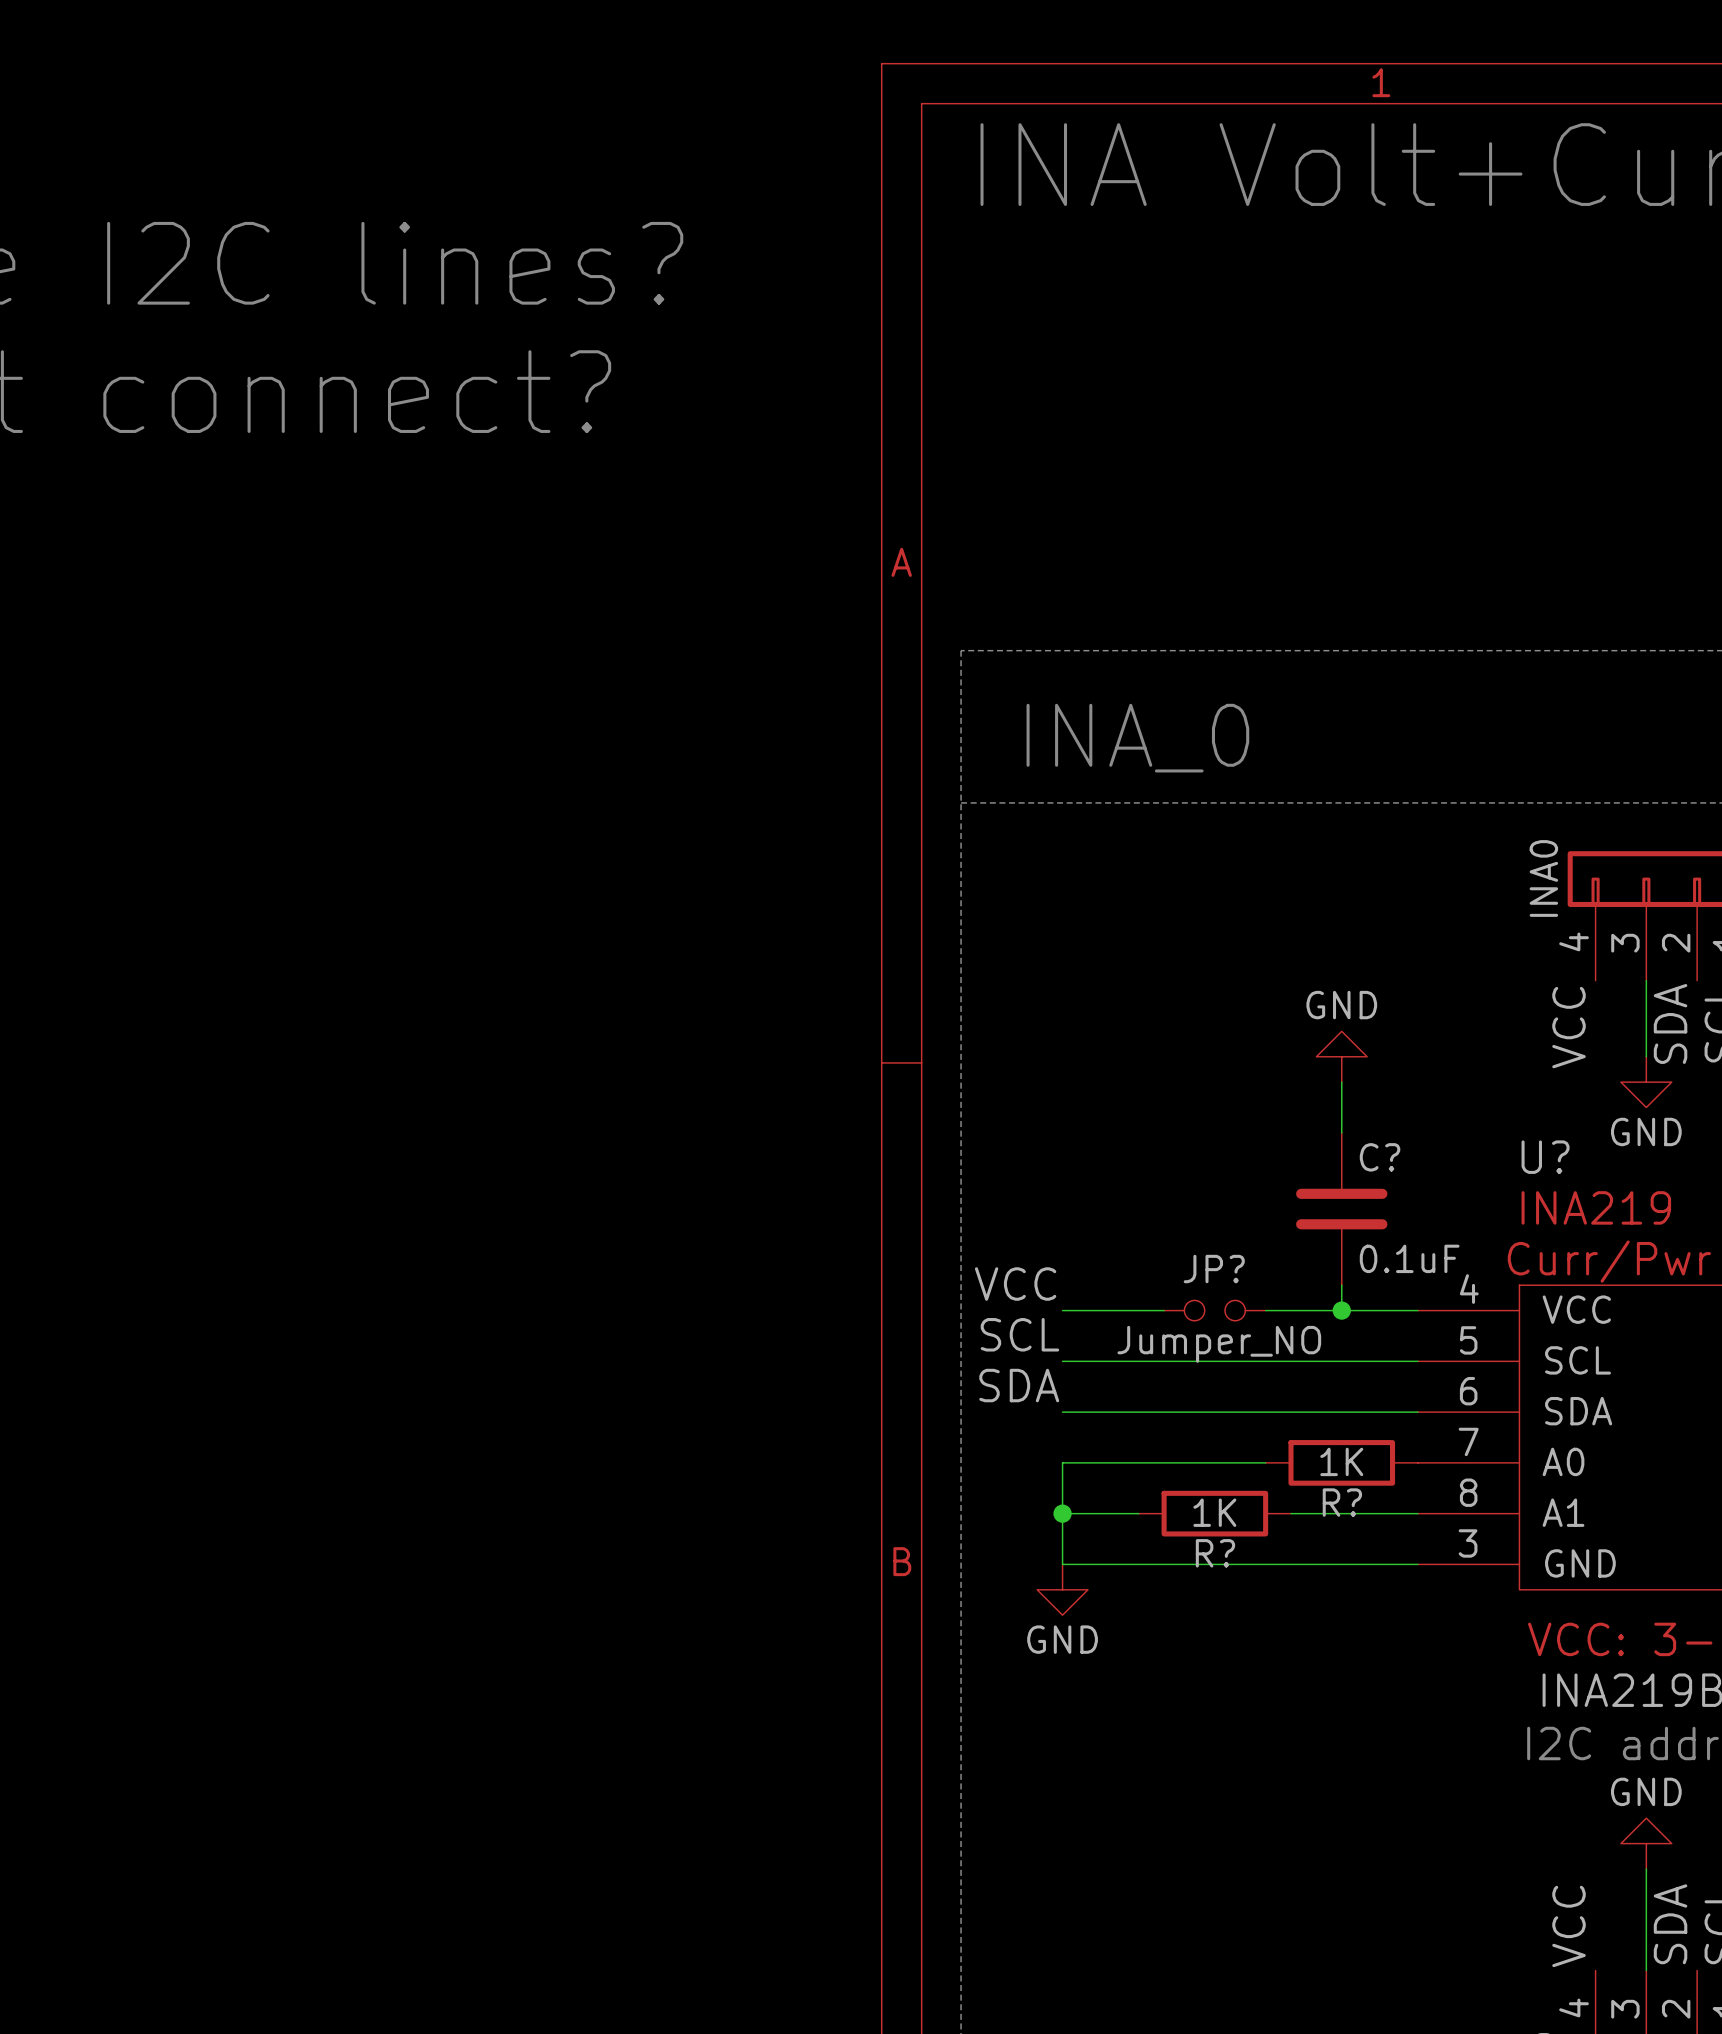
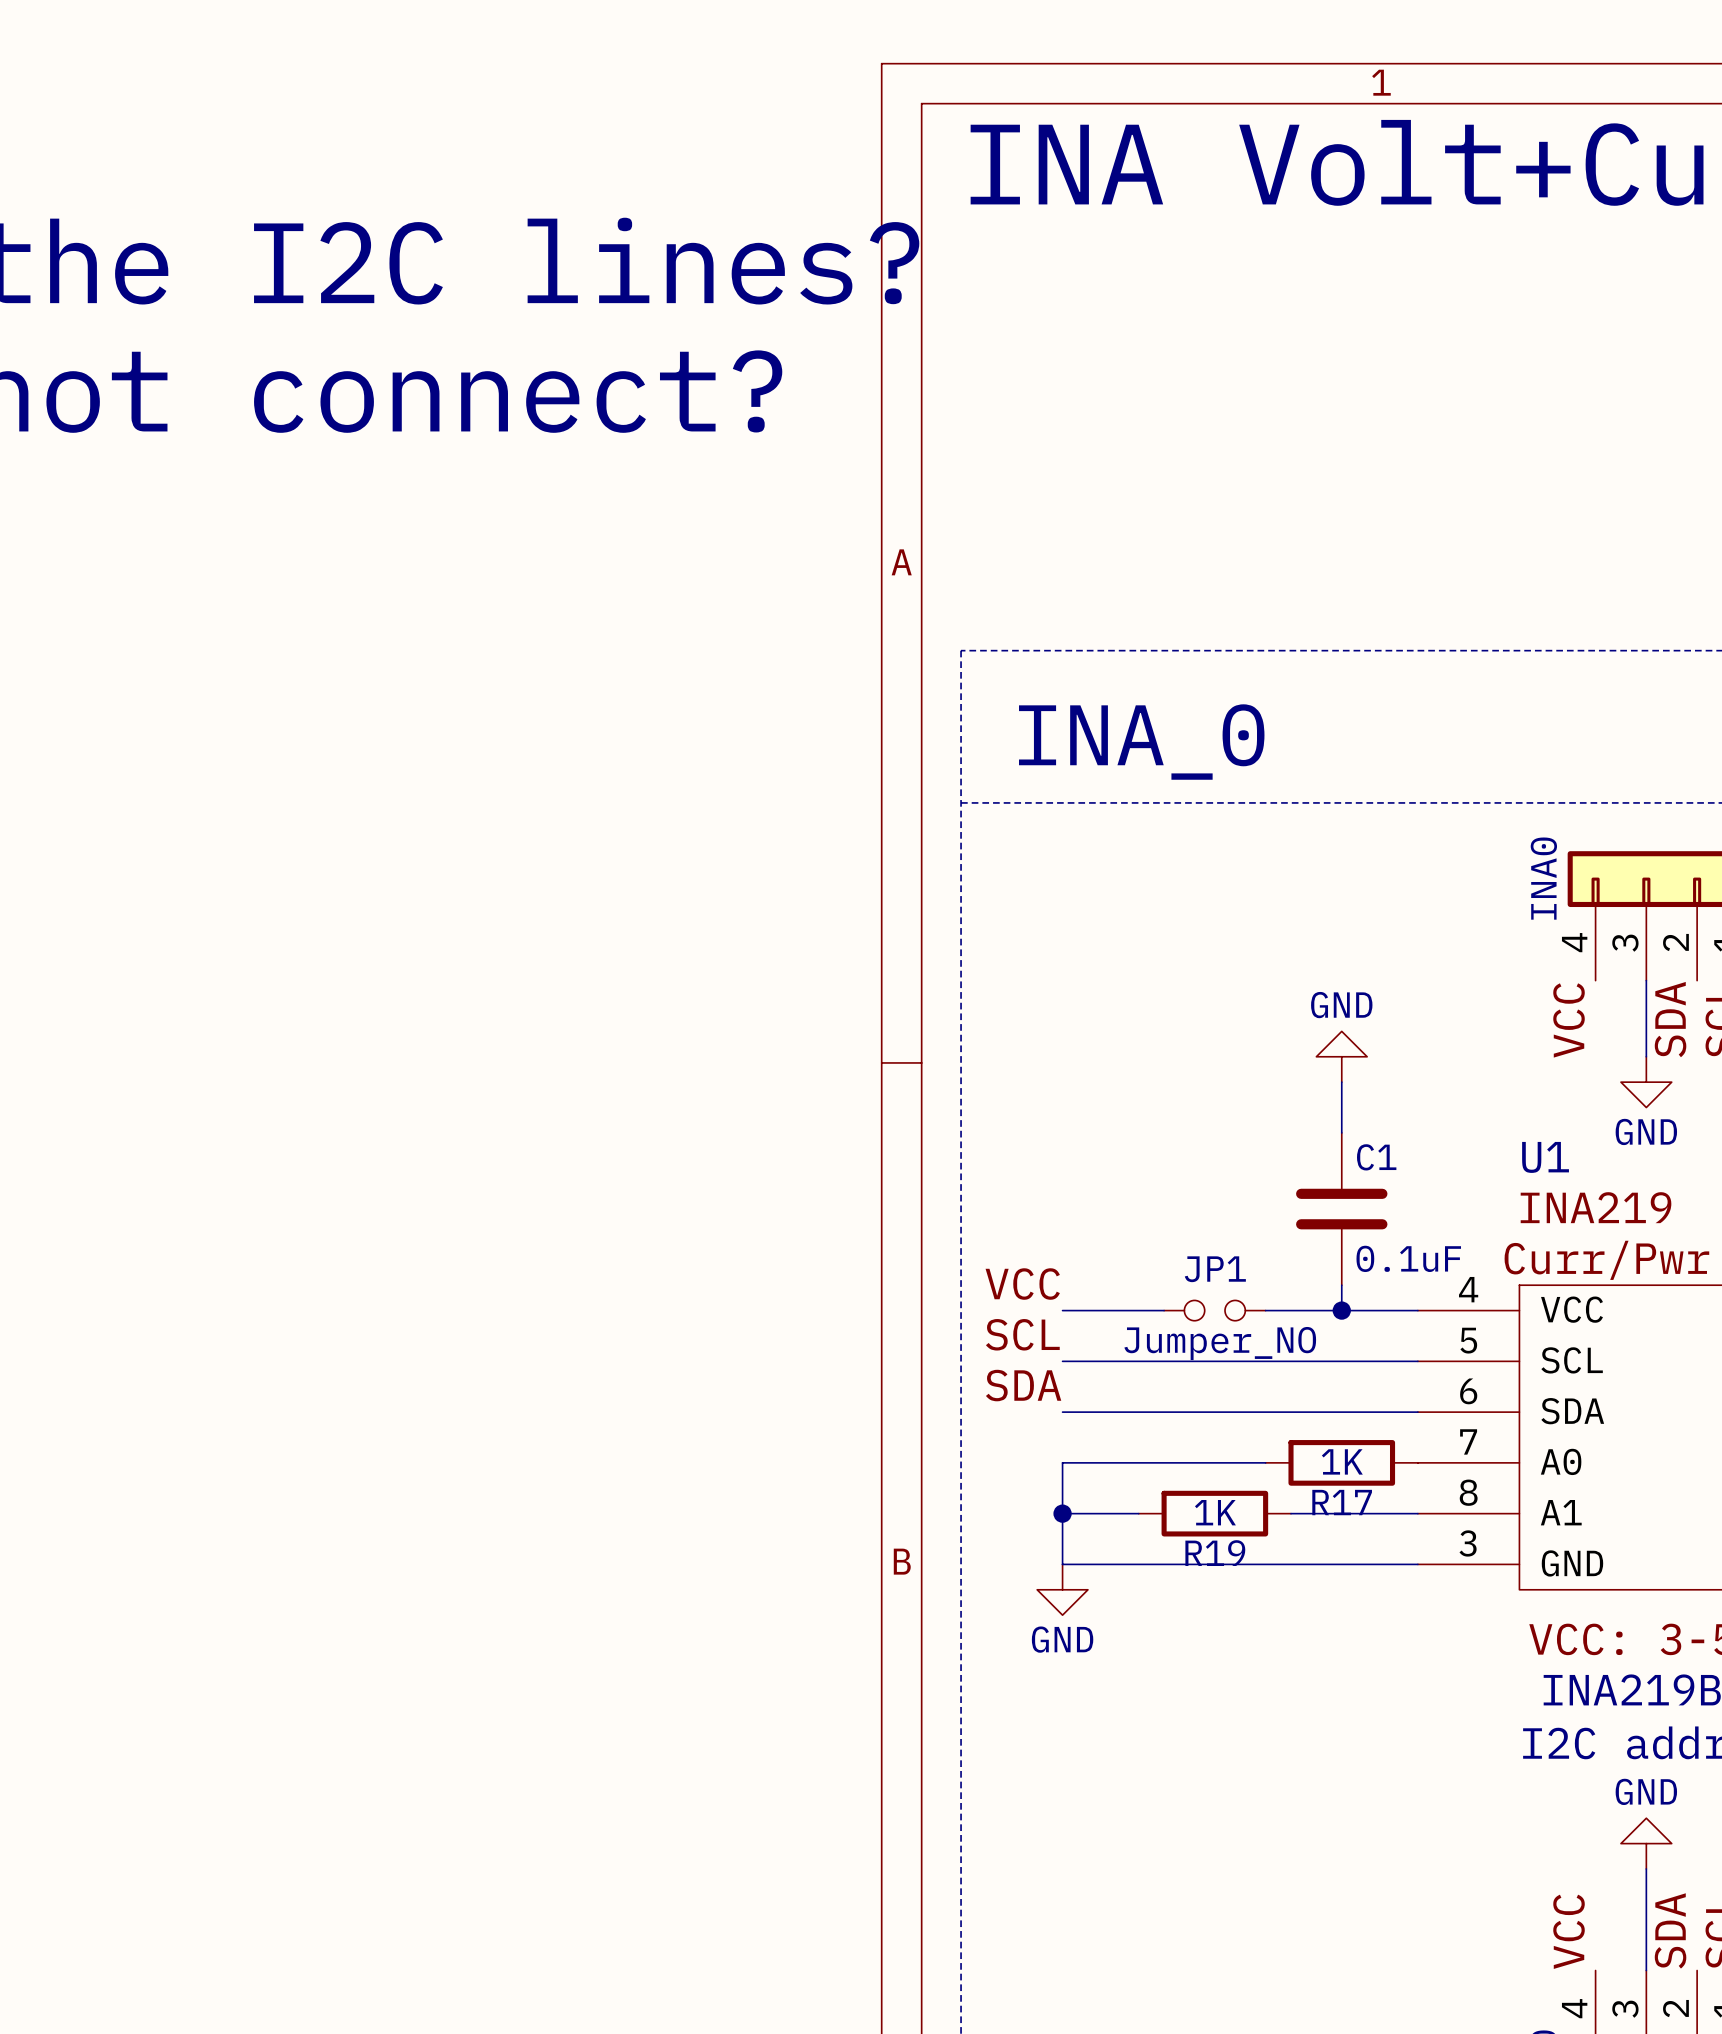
C? name: C? (1380, 1157) -> C1 (1376, 1157)
U? name: U? (1545, 1157) -> U1 (1545, 1157)
JP? name: JP? (1214, 1269) -> JP1 (1215, 1269)
R? name: R? (1342, 1502) -> R17 (1342, 1502)
R? name: R? (1215, 1553) -> R19 (1215, 1553)

